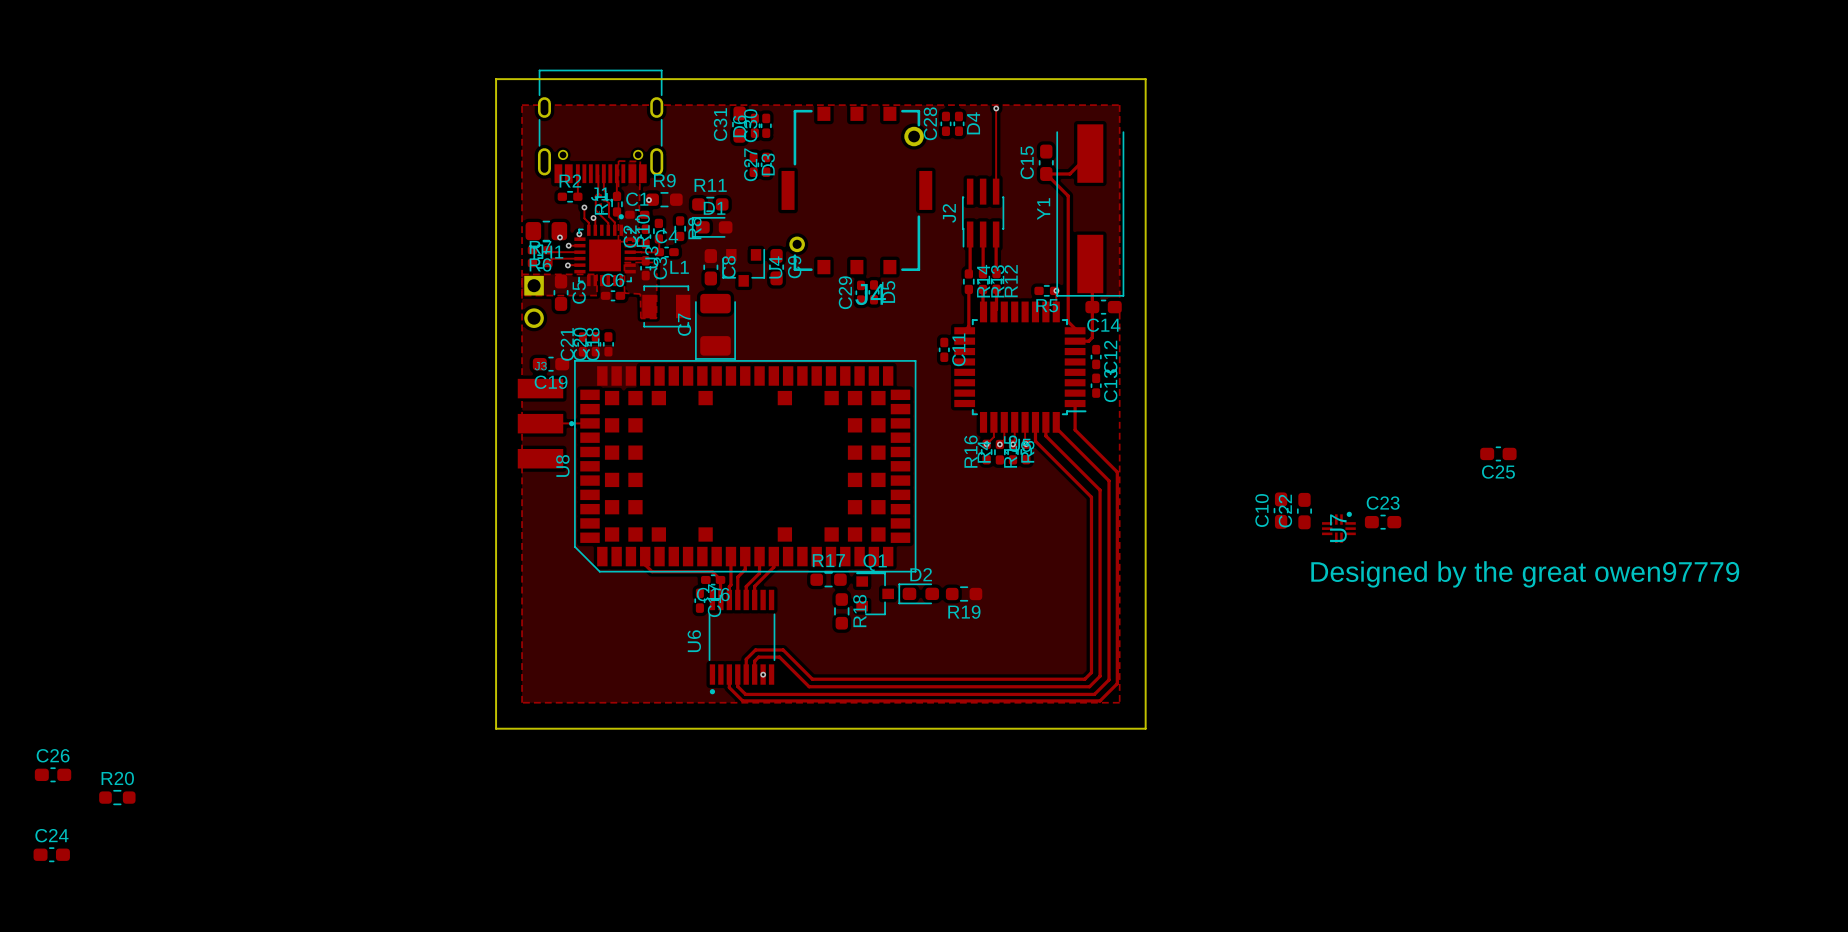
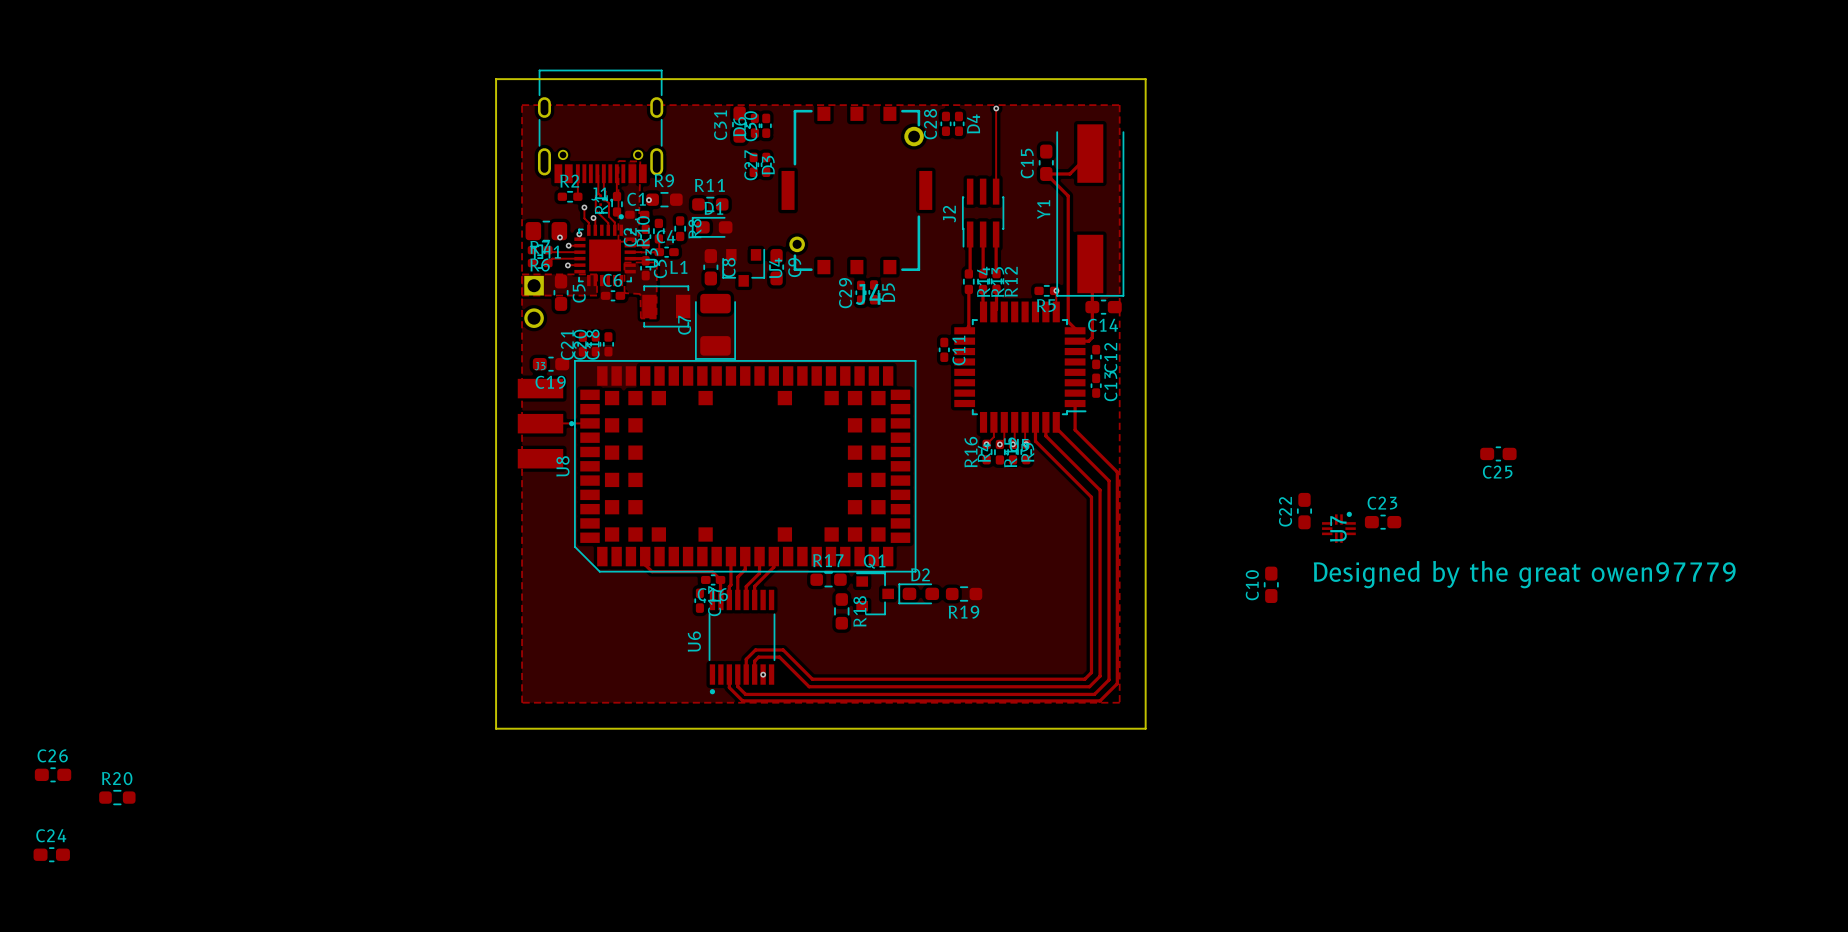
C10 position: (1281, 510) -> (1271, 584)

